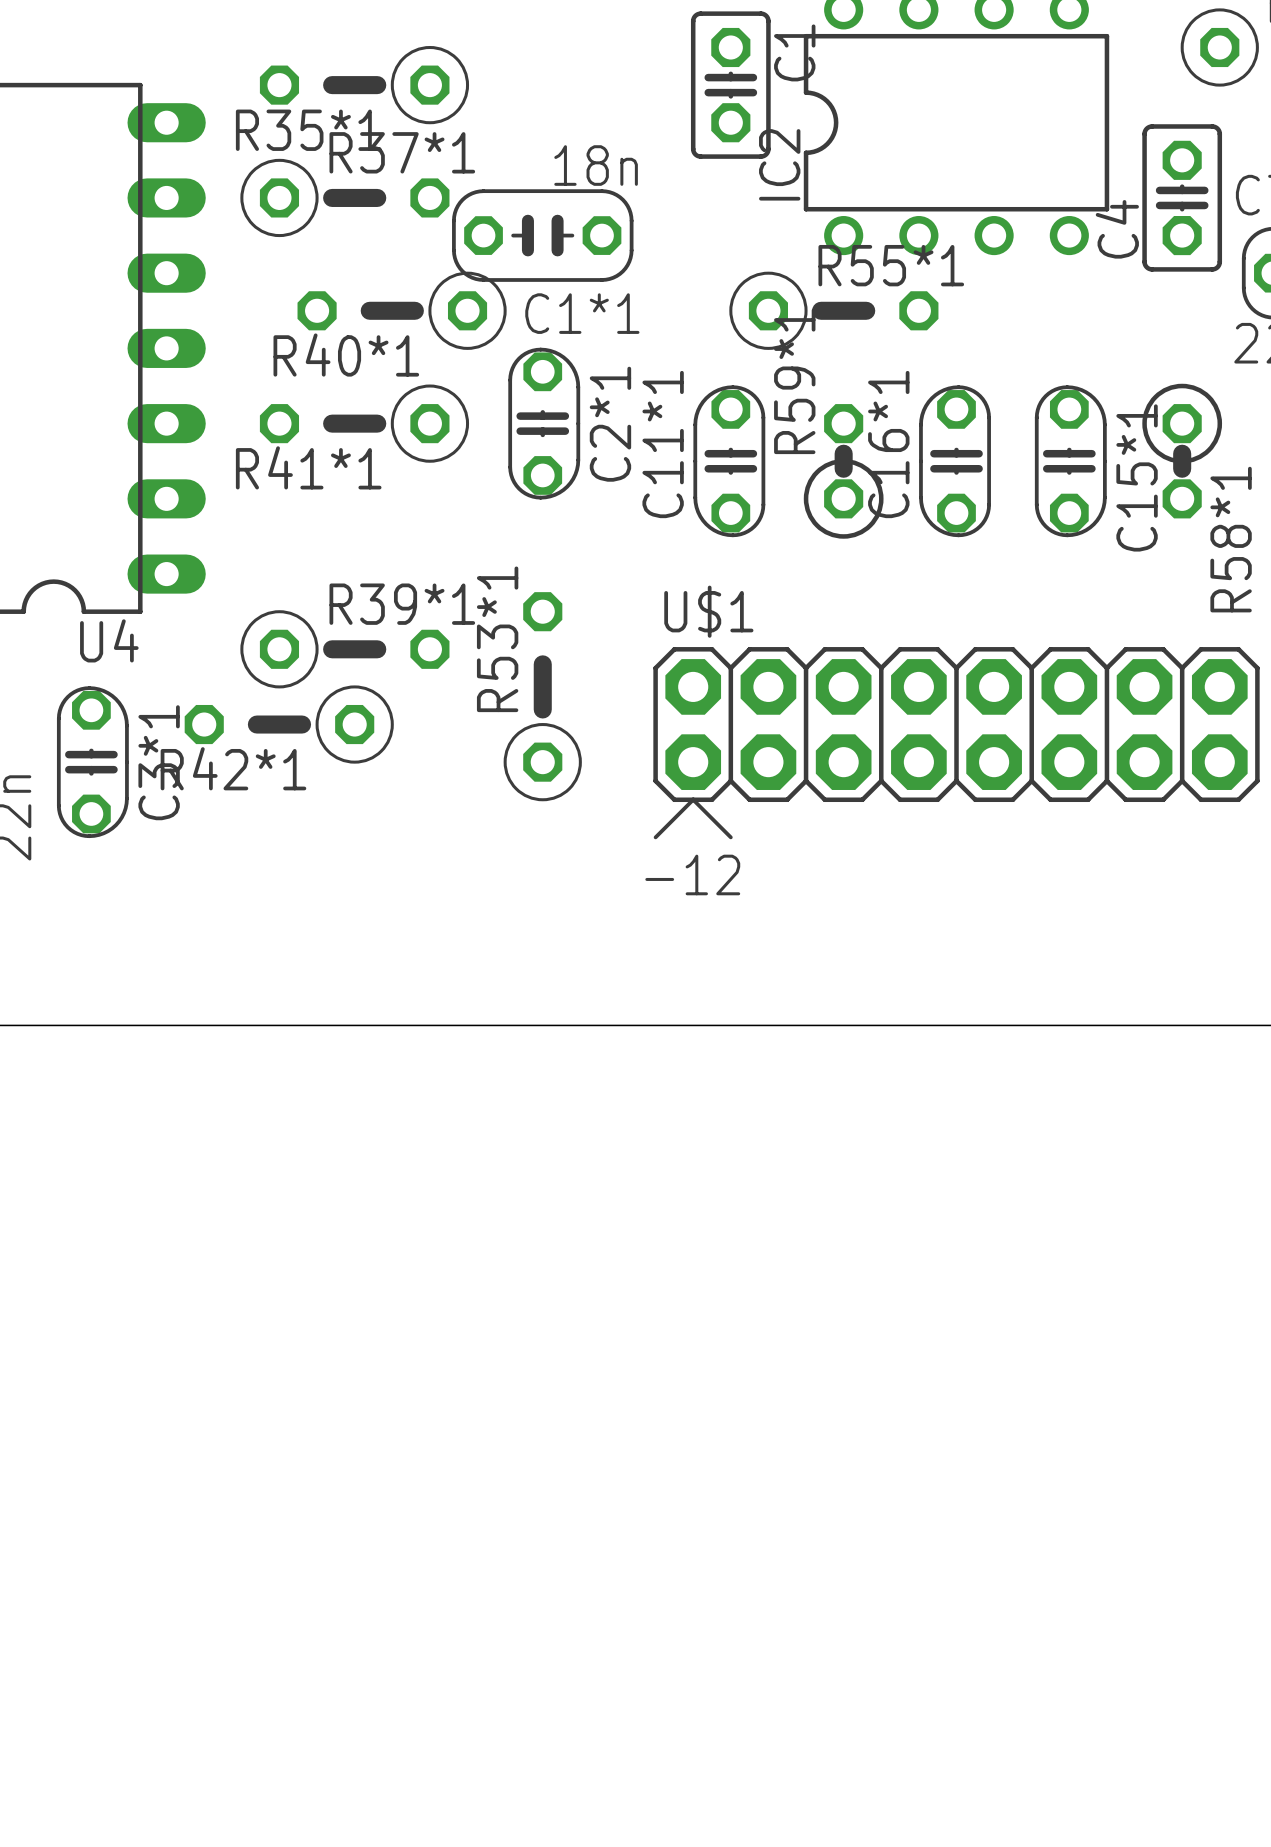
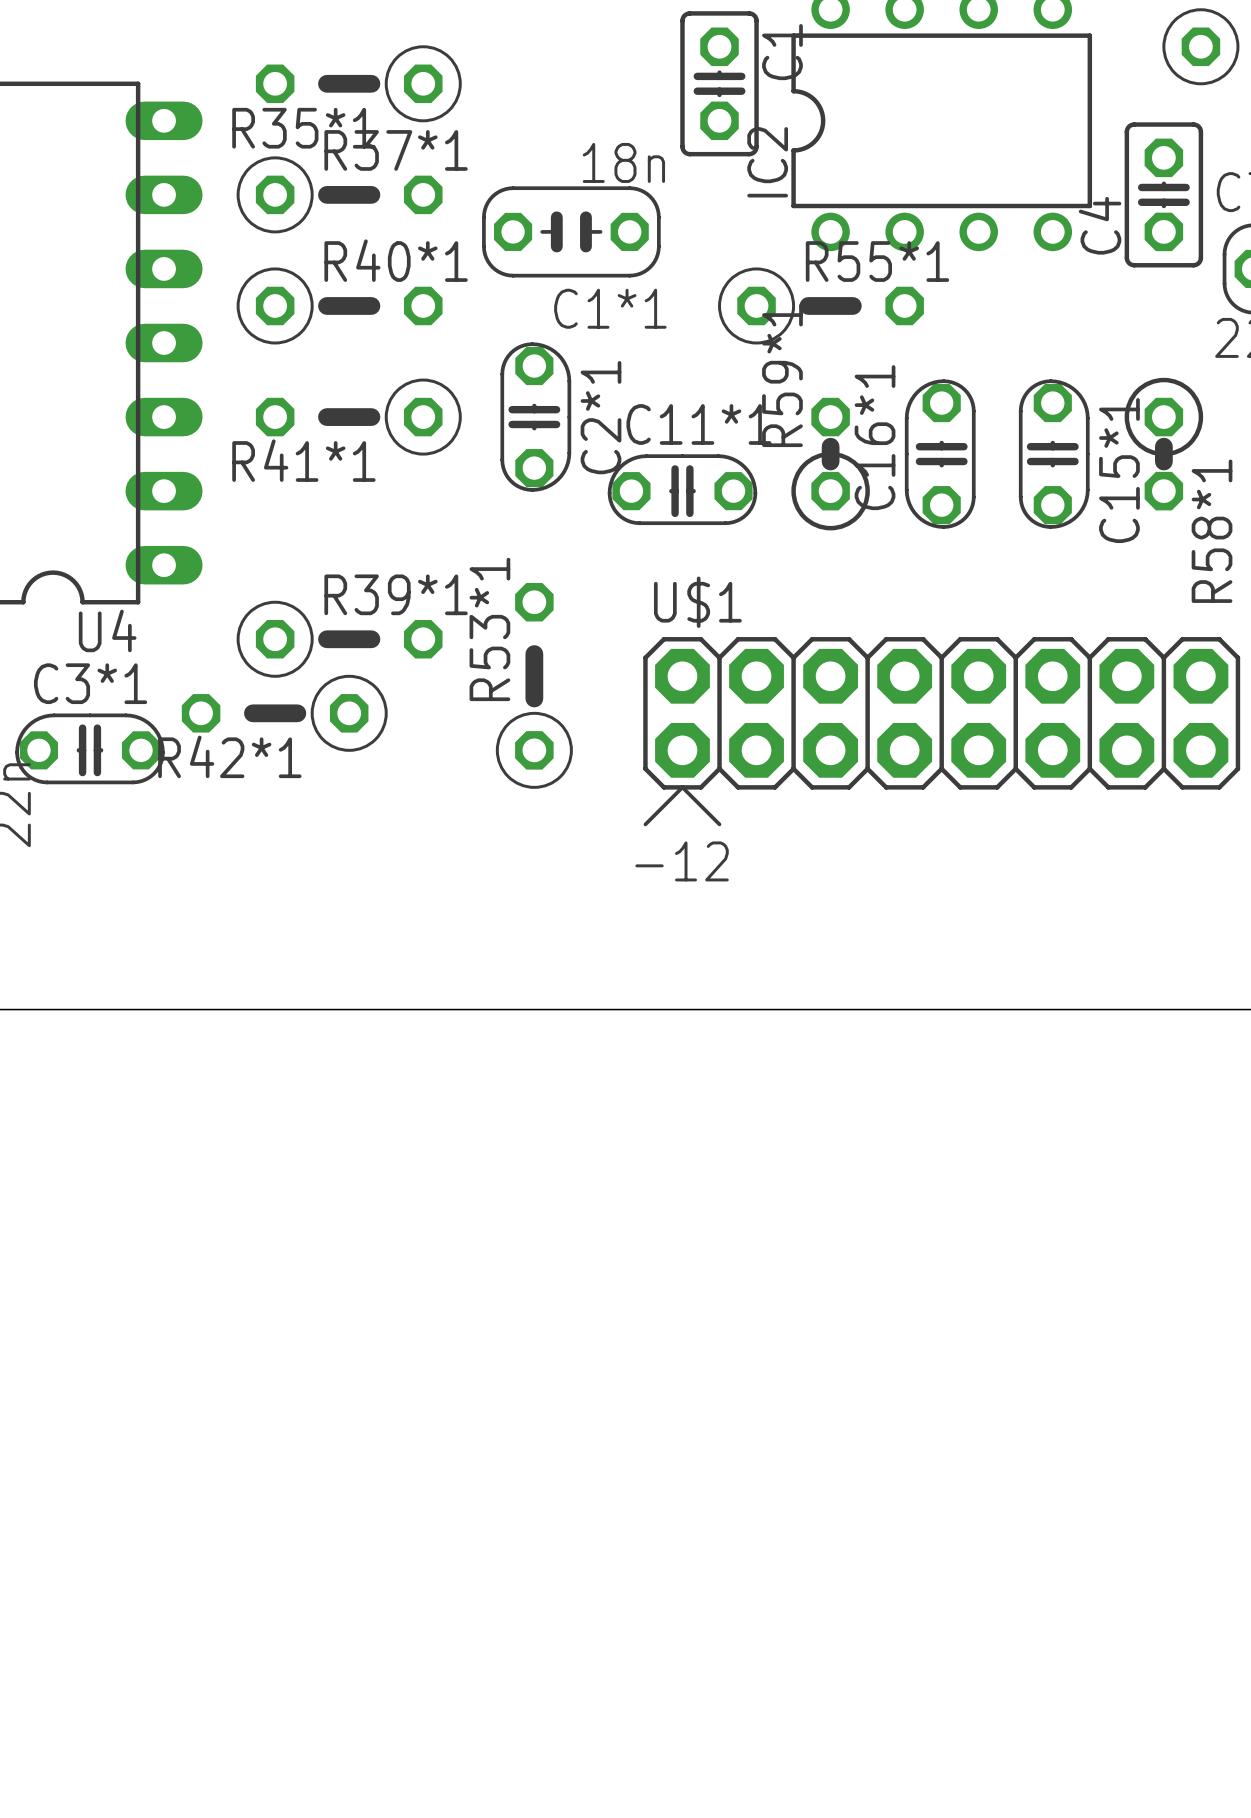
C1*1 position: (542, 235) -> (571, 231)
R40*1 rotation: 0° (402, 310) -> 180° (339, 305)
C11*1 rotation: 0° (729, 461) -> 90° clockwise (682, 489)
C3*1 rotation: 0° (92, 762) -> 90° counterclockwise (89, 748)

